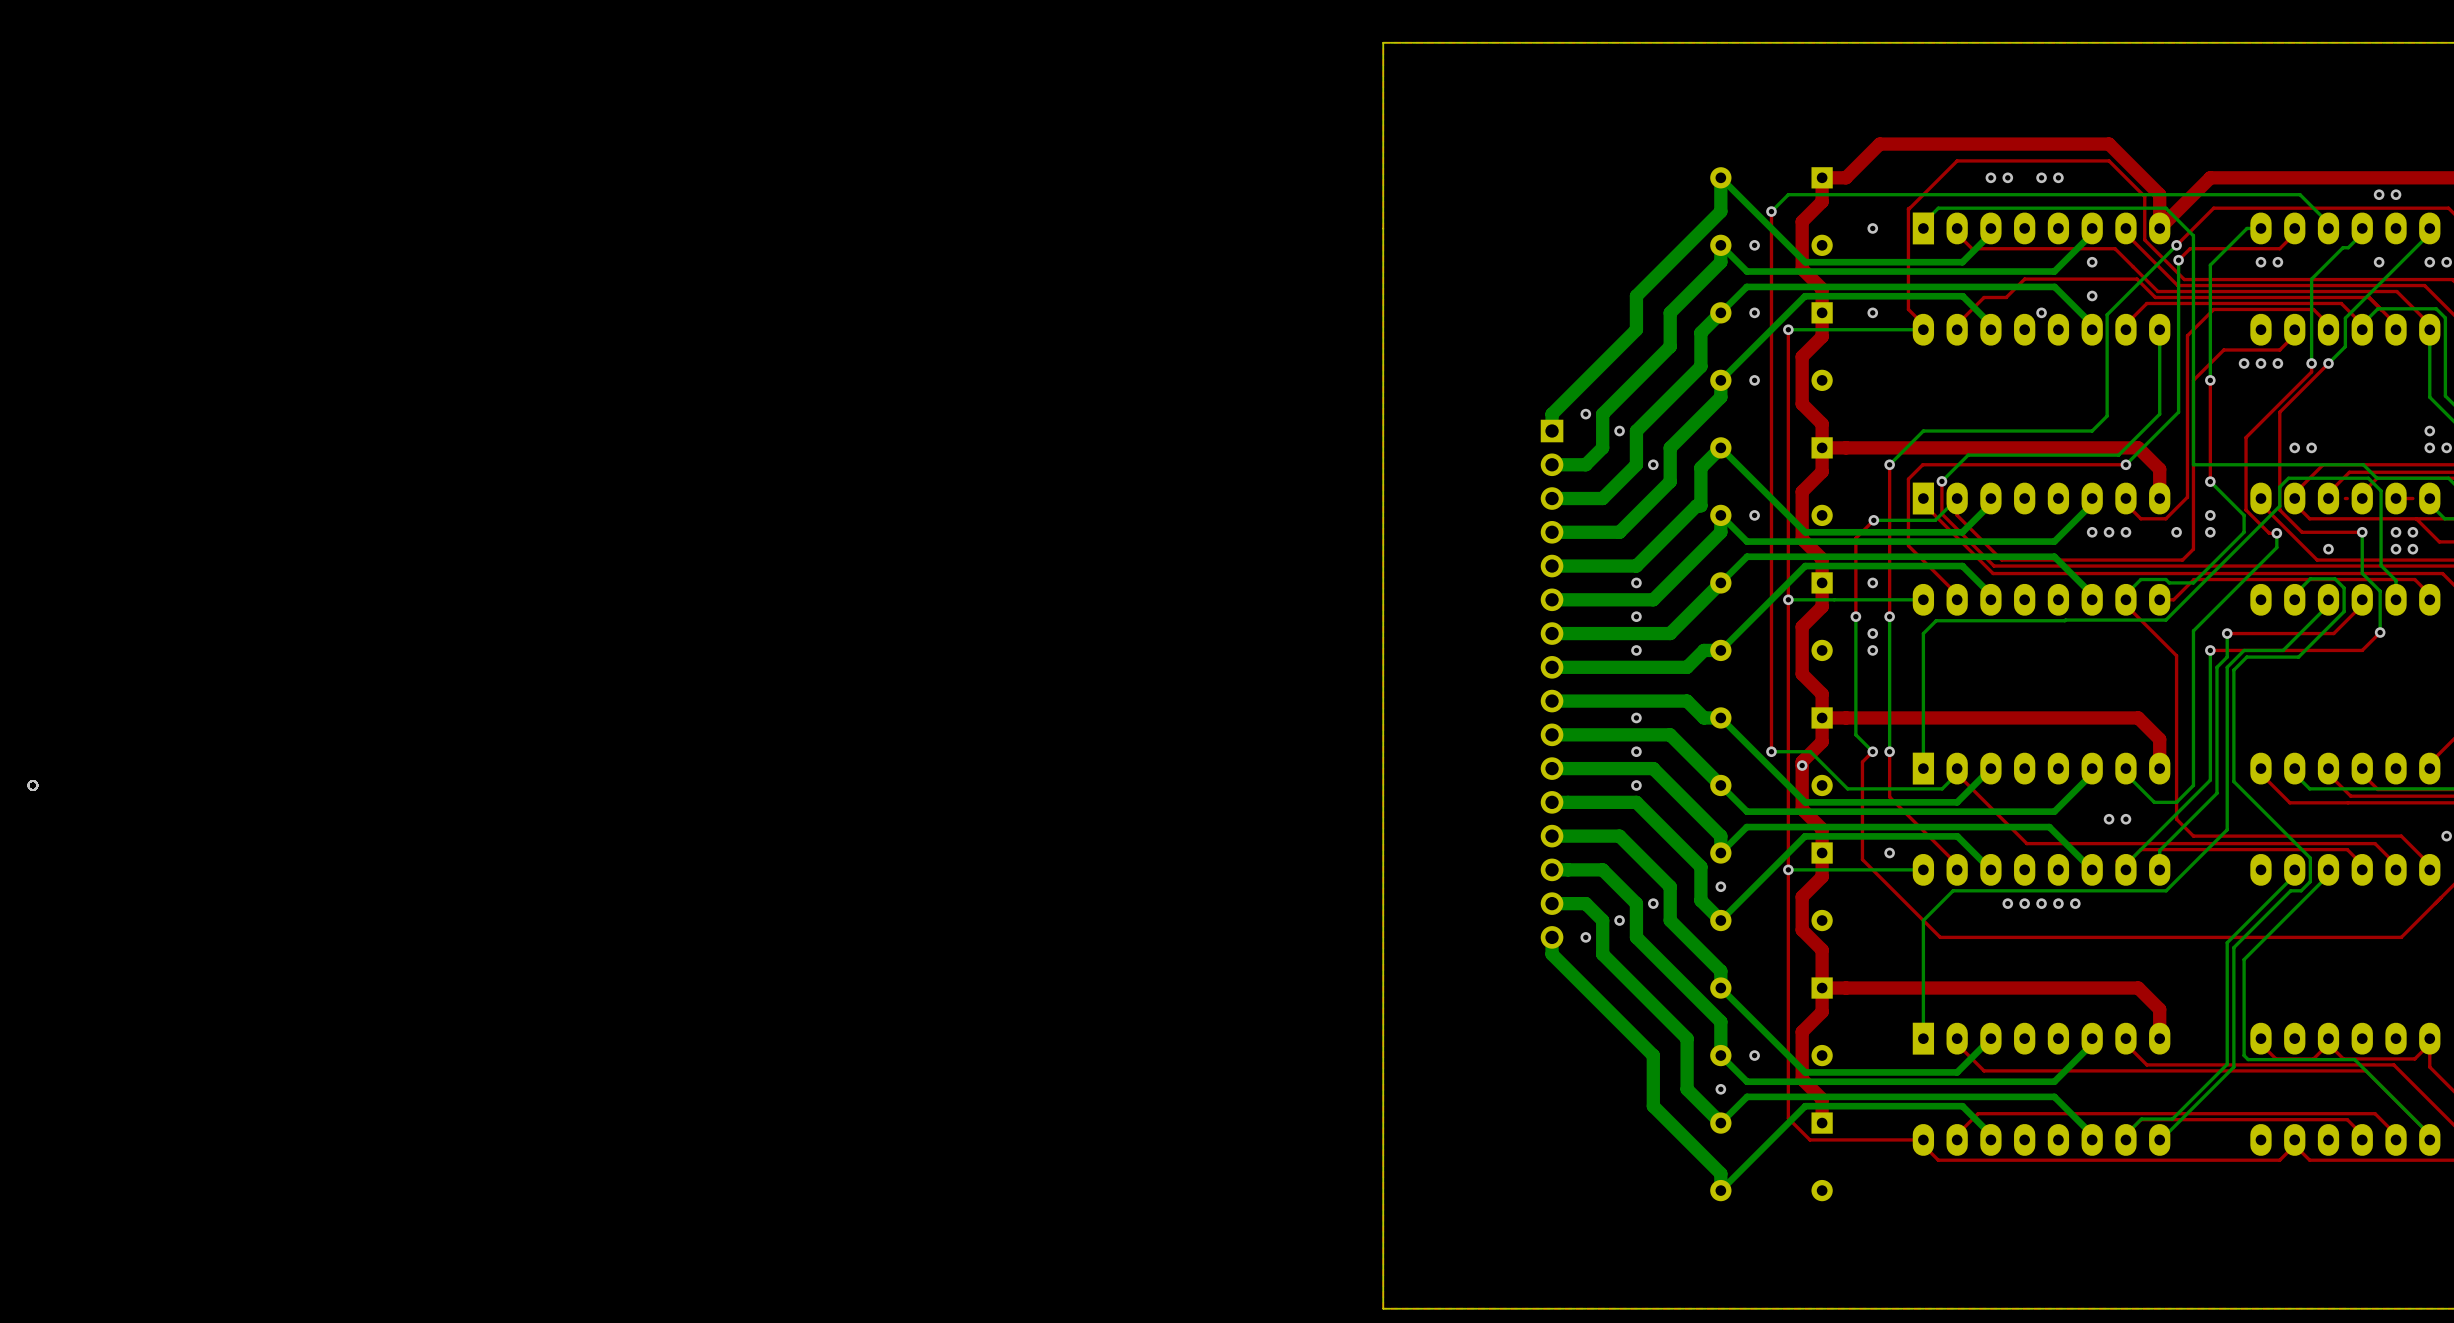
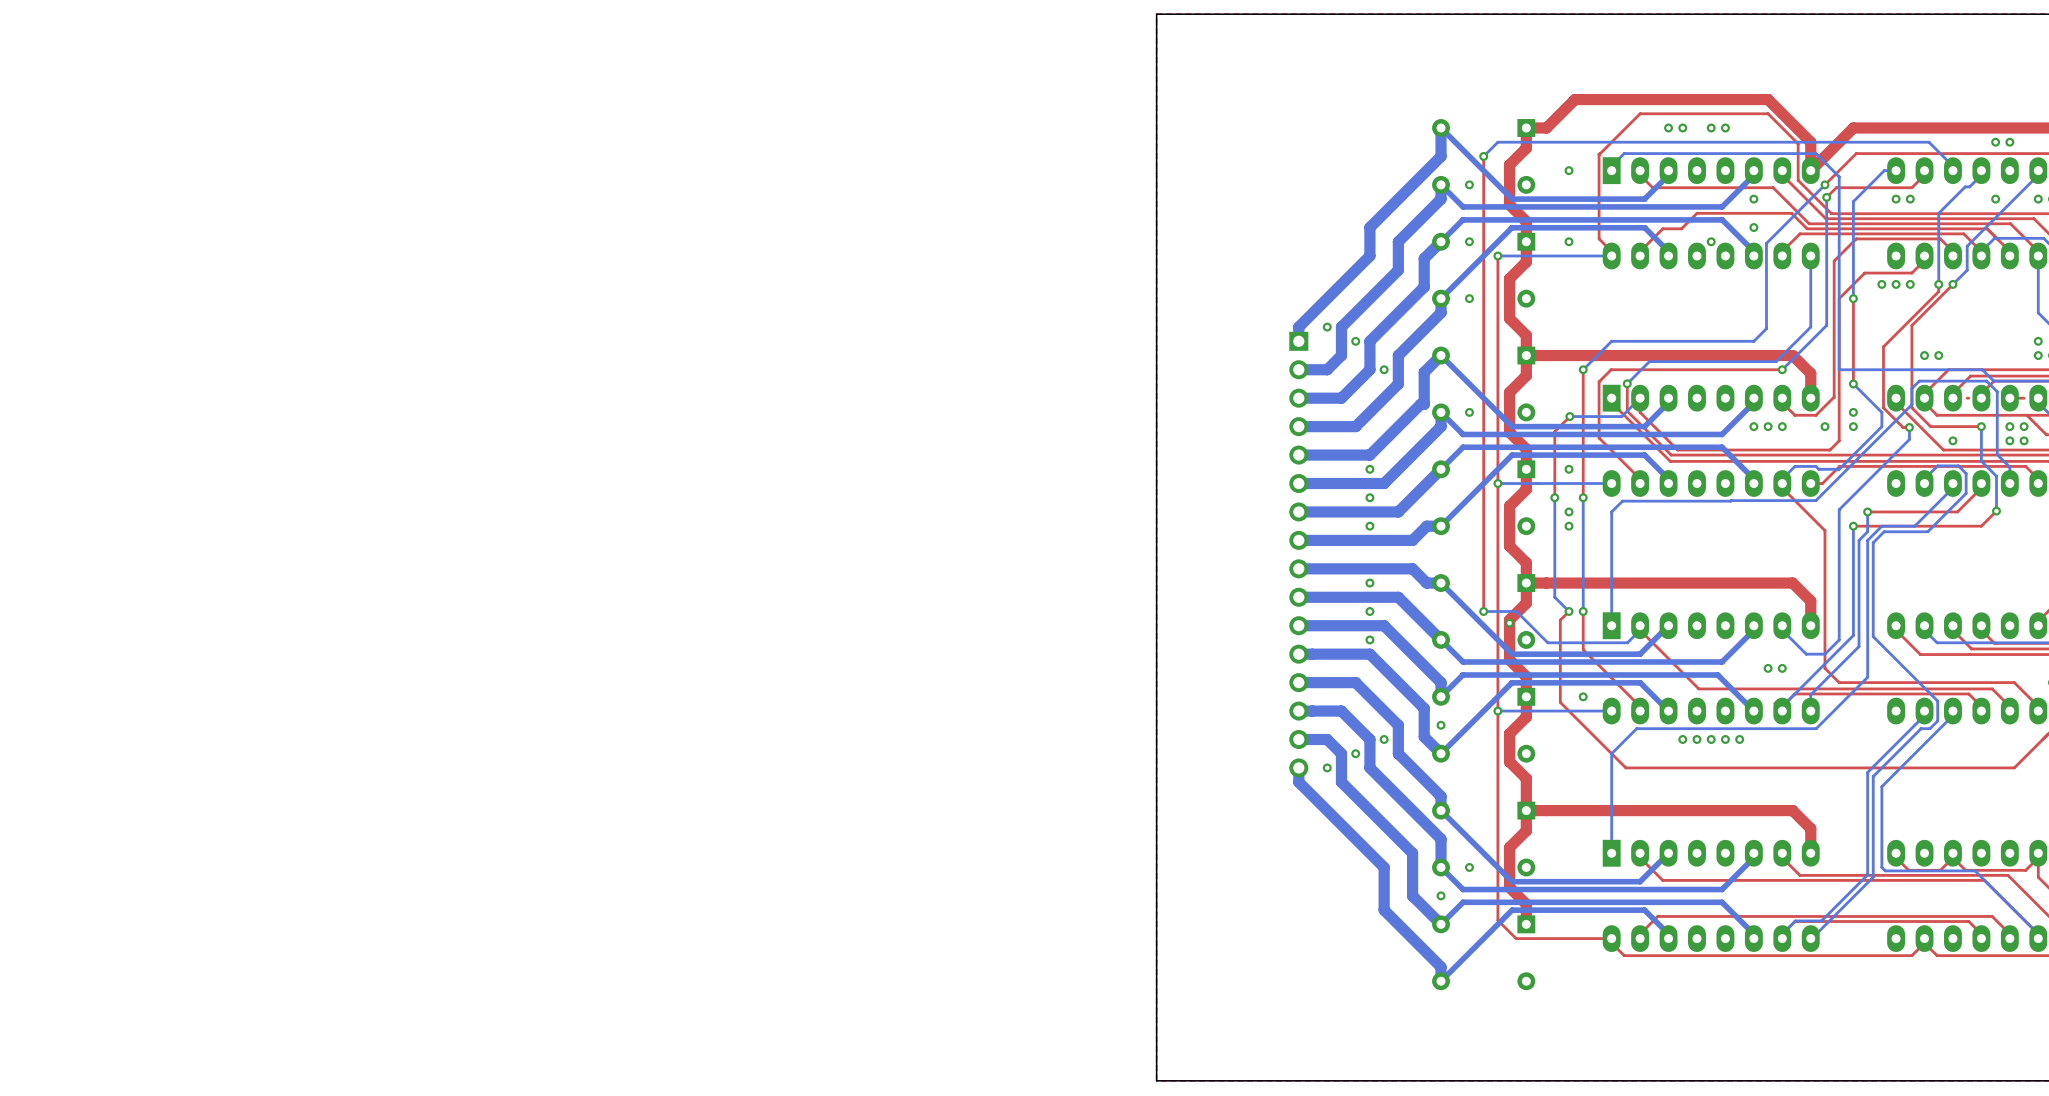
via: (32, 785) -> none

